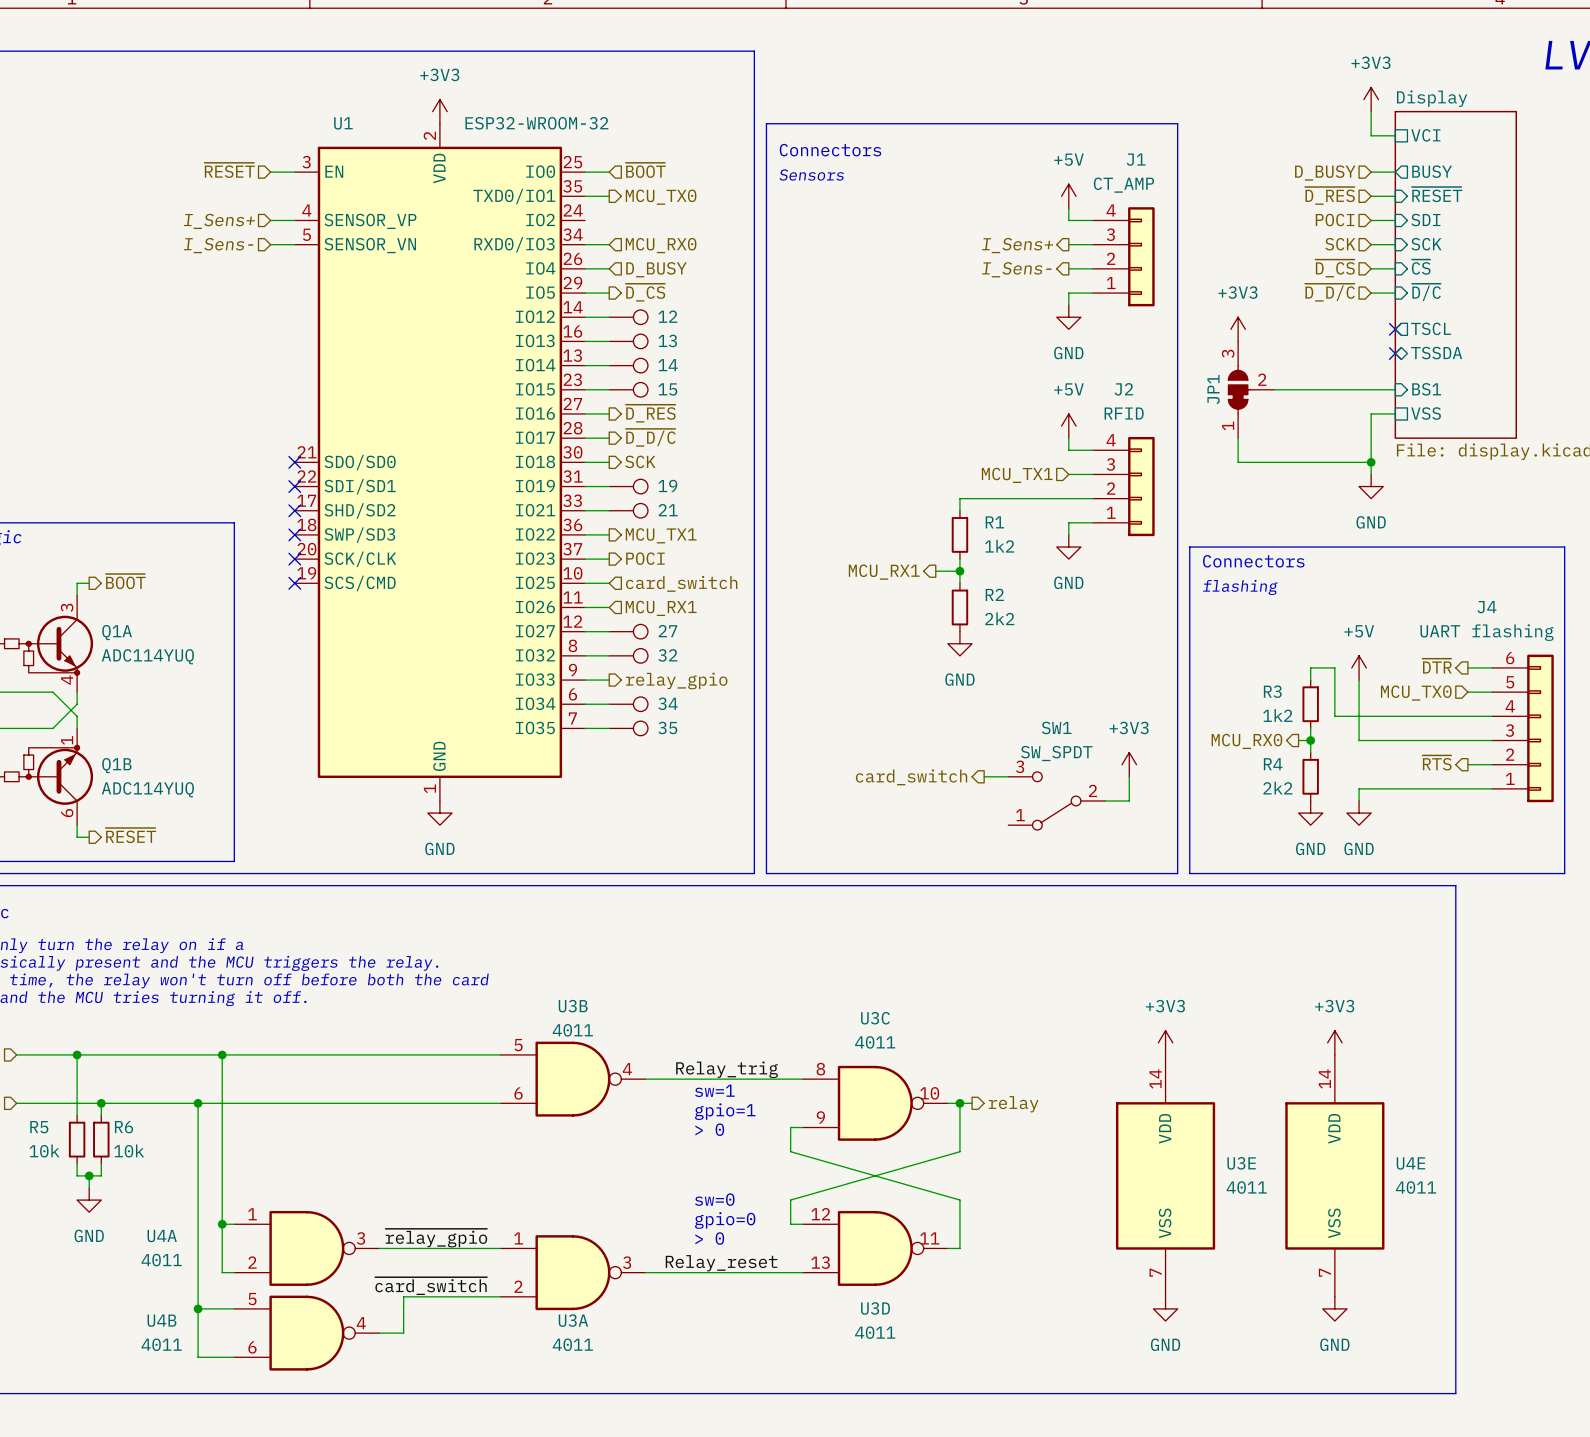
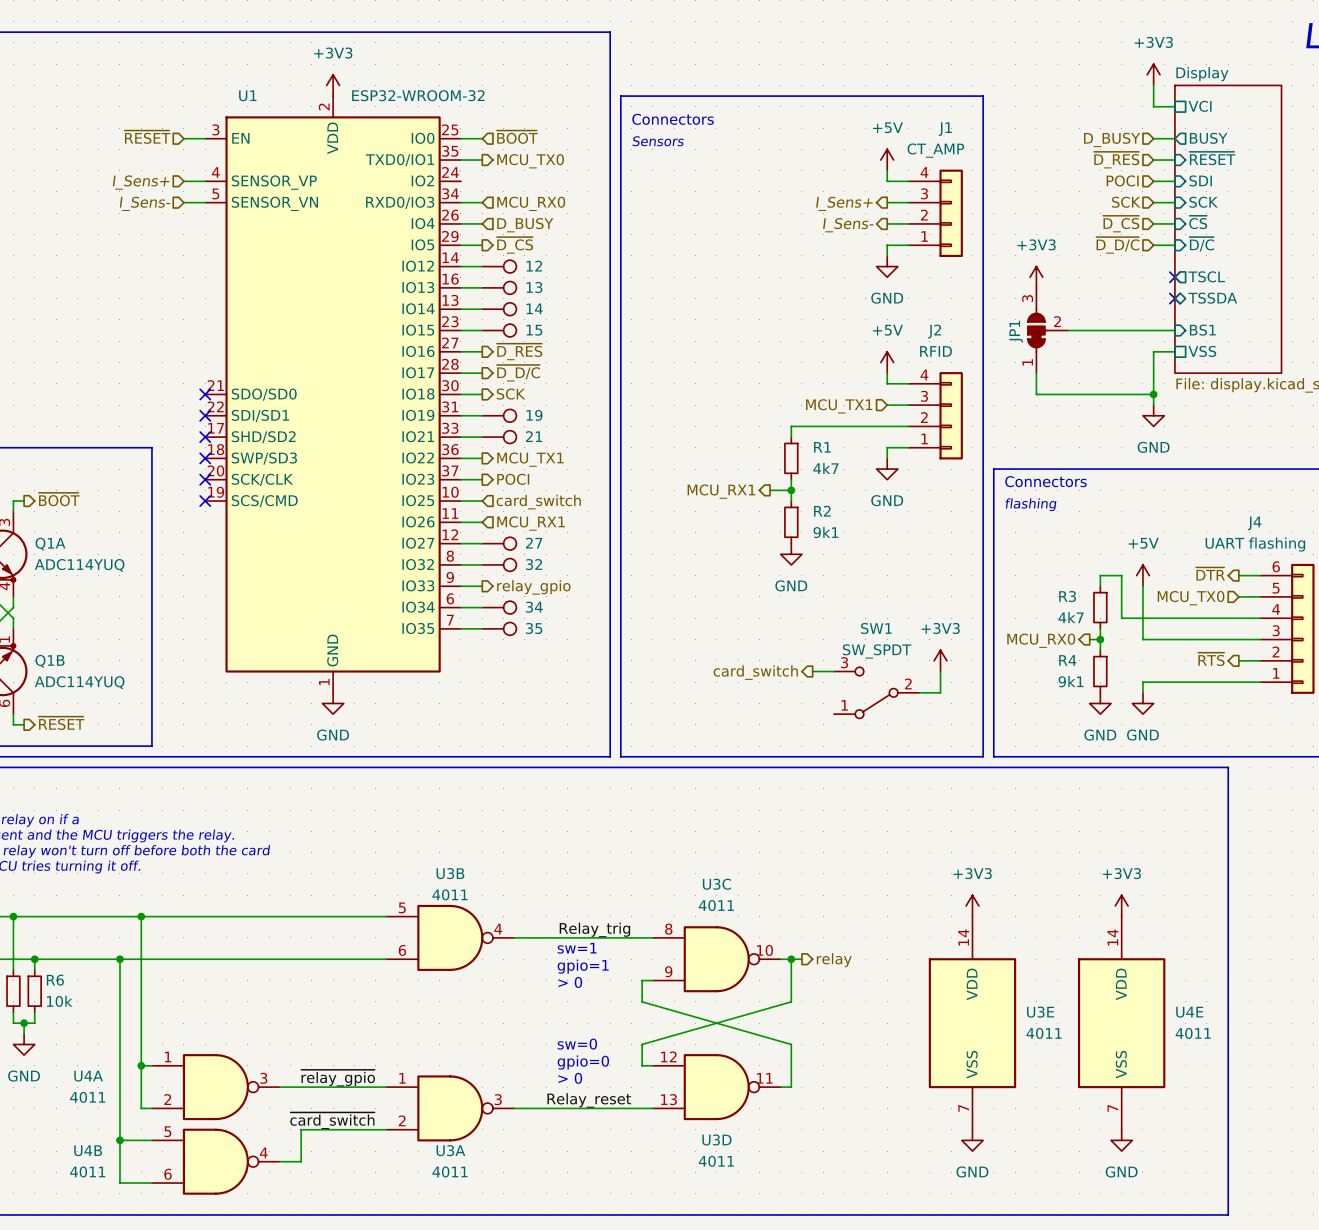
R1 value: 1k2 (999, 546) -> 4k7 (825, 468)
R2 value: 2k2 (999, 618) -> 9k1 (825, 532)
R3 value: 1k2 (1277, 715) -> 4k7 (1070, 617)
R4 value: 2k2 (1277, 788) -> 9k1 (1071, 681)

